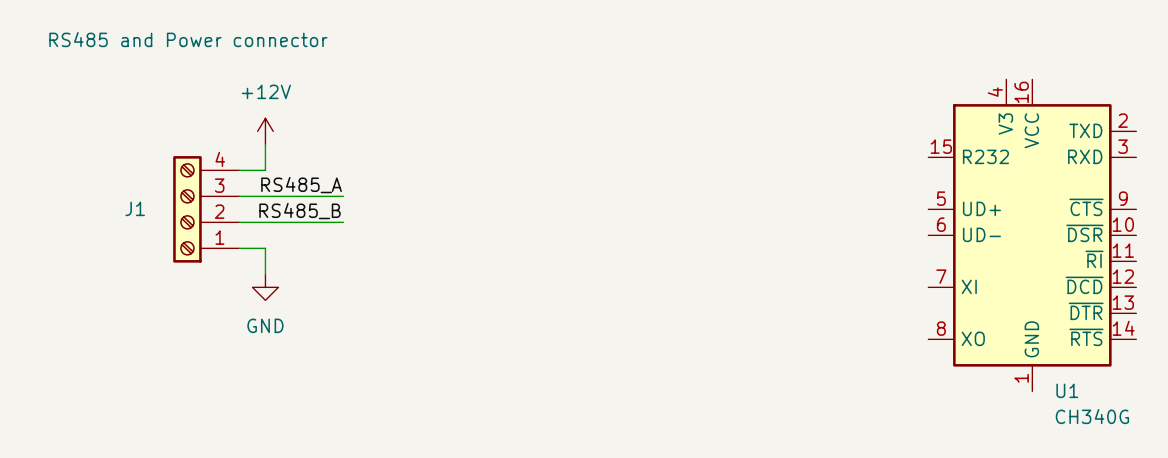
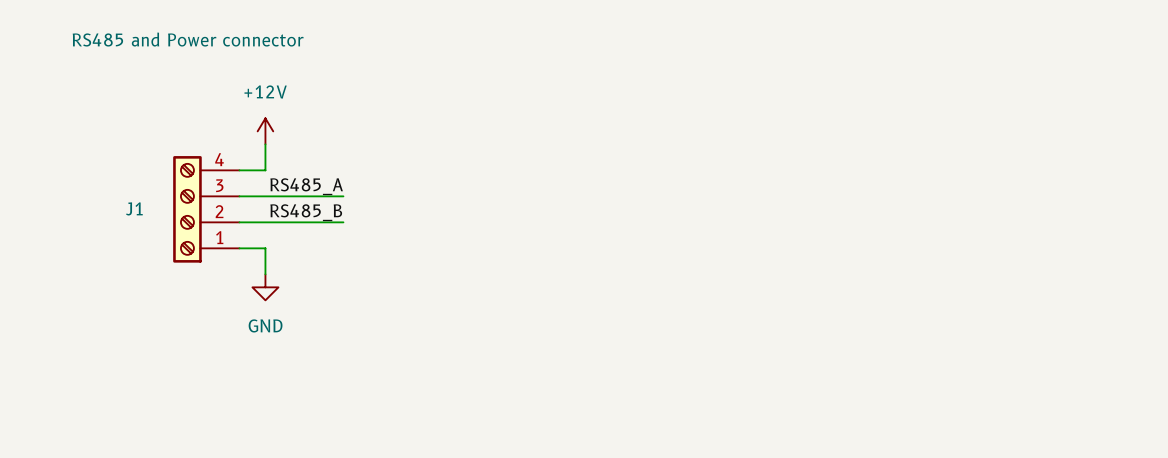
U1: CH340G (1032, 235) -> none

